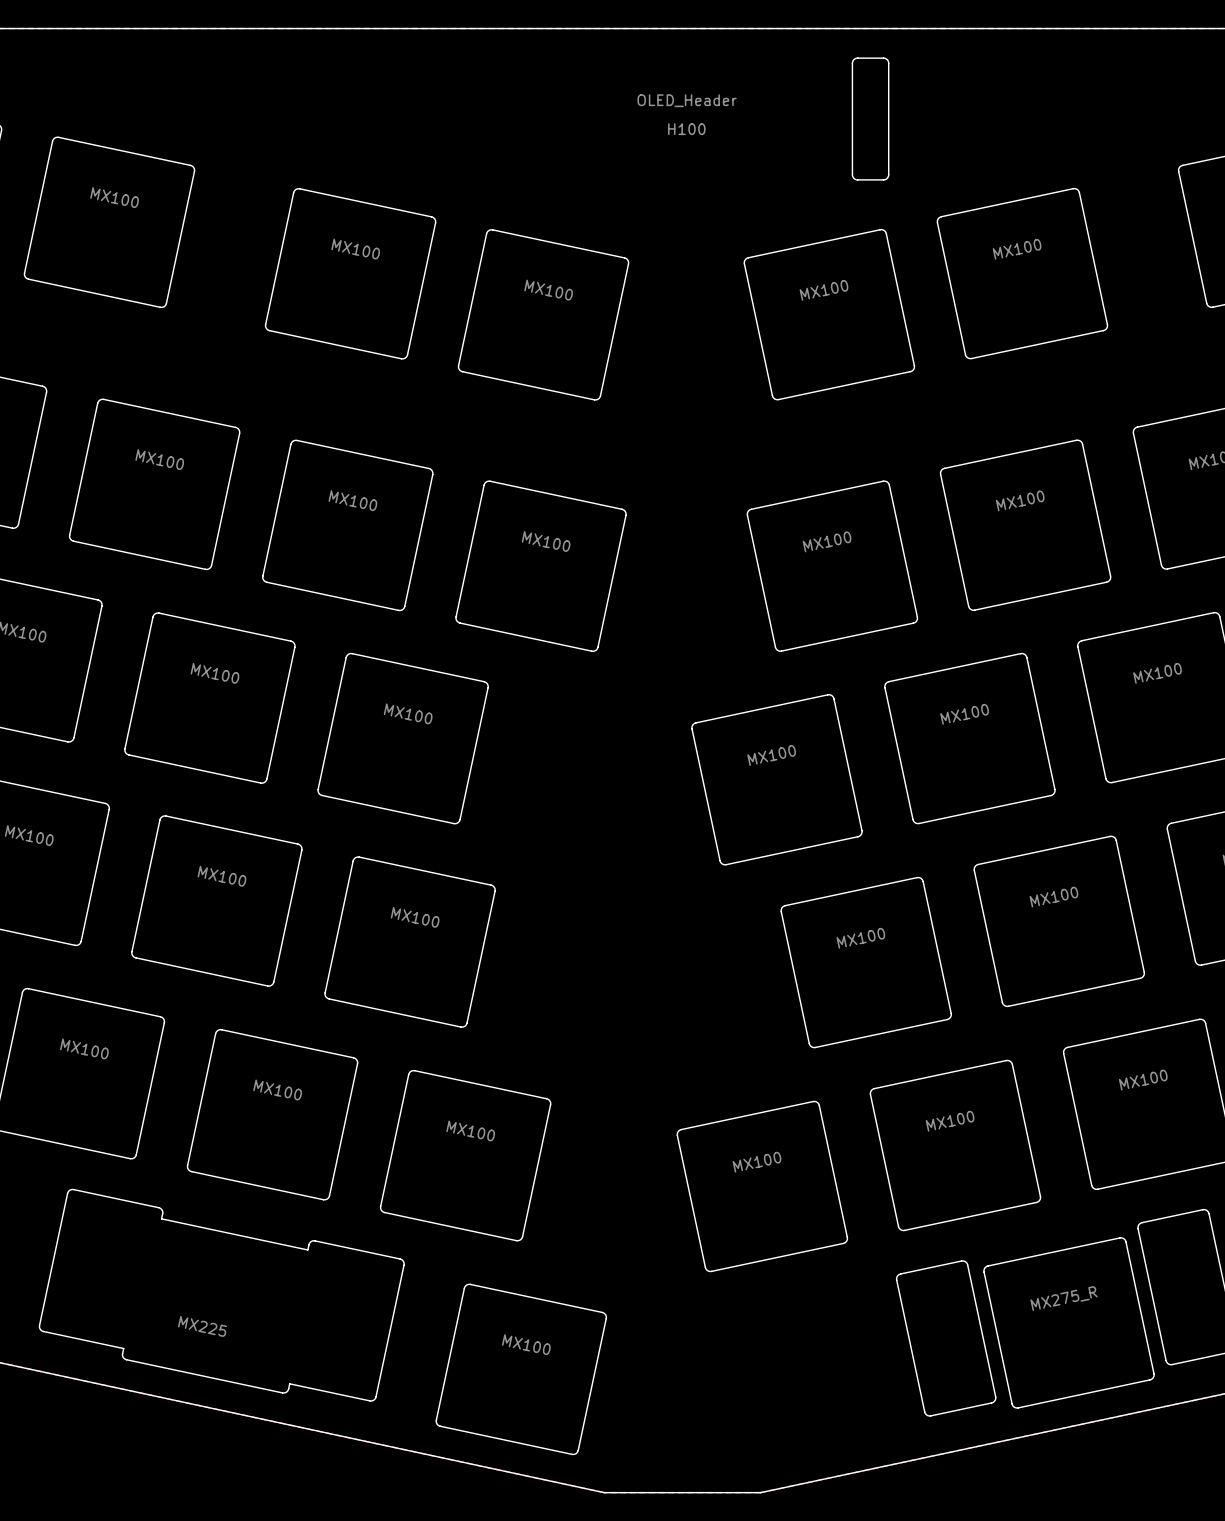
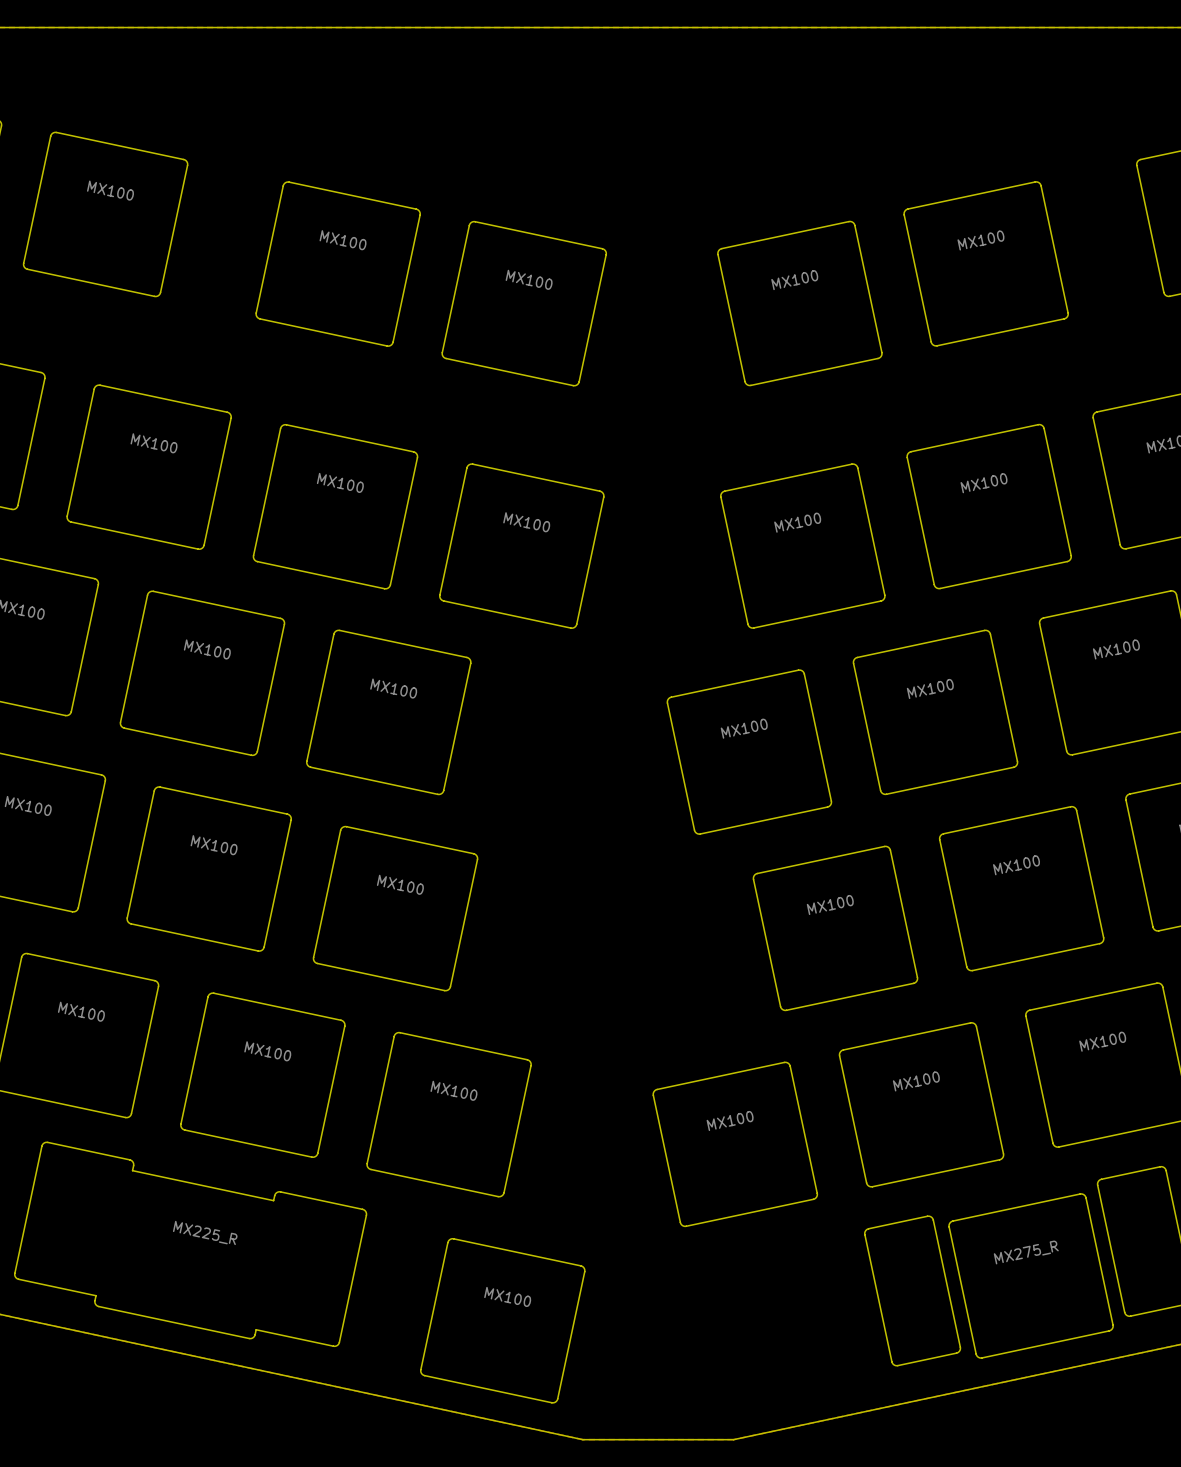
H100: OLED_Header (870, 119) -> none
drawing: none -> [14, 1142, 367, 1347]
drawing: [39, 1189, 405, 1402] -> none

